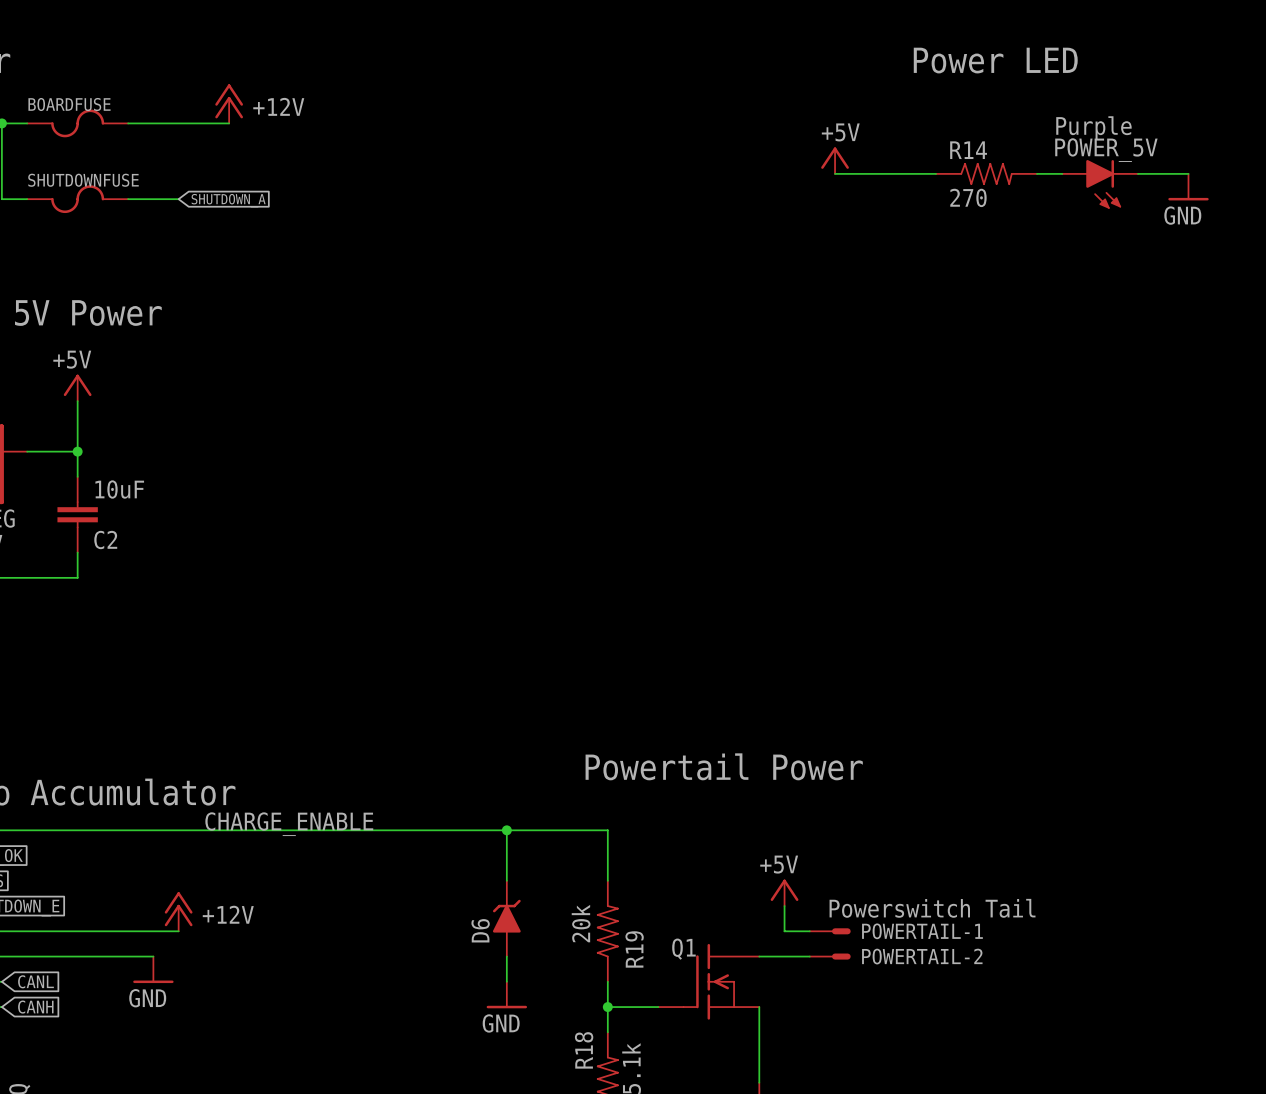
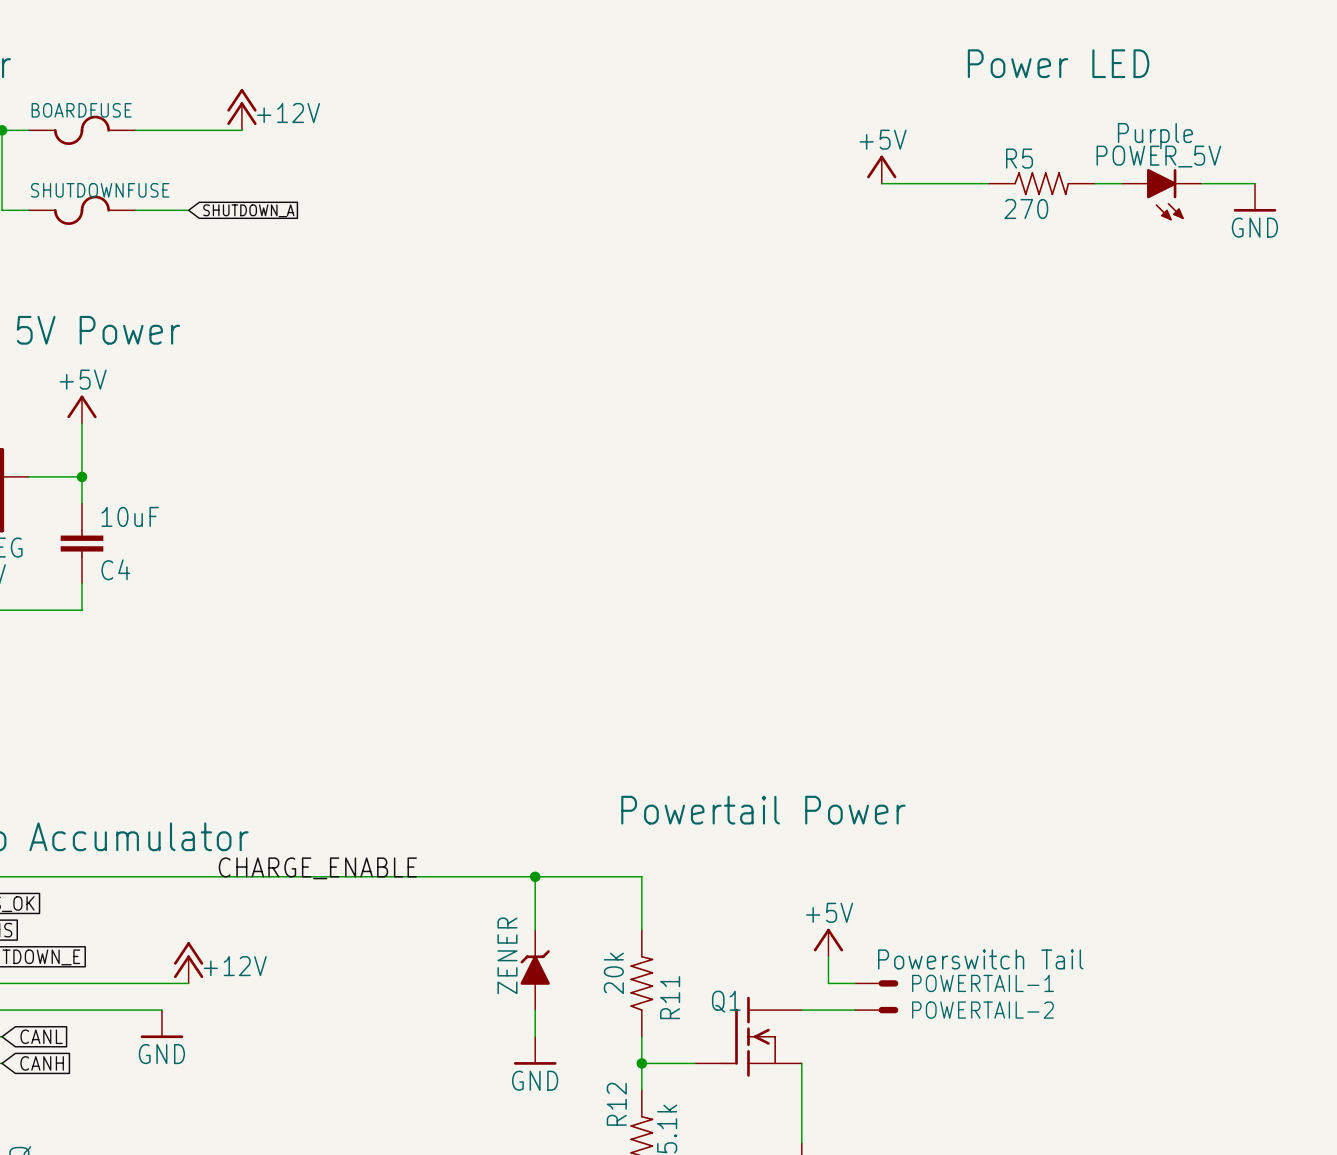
R14 name: R14 (968, 150) -> R5 (1019, 158)
C2 name: C2 (105, 540) -> C4 (115, 569)
D6 name: D6 (480, 930) -> ZENER (507, 955)
R19 name: R19 (634, 949) -> R11 (670, 997)
R18 name: R18 (584, 1050) -> R12 (616, 1104)

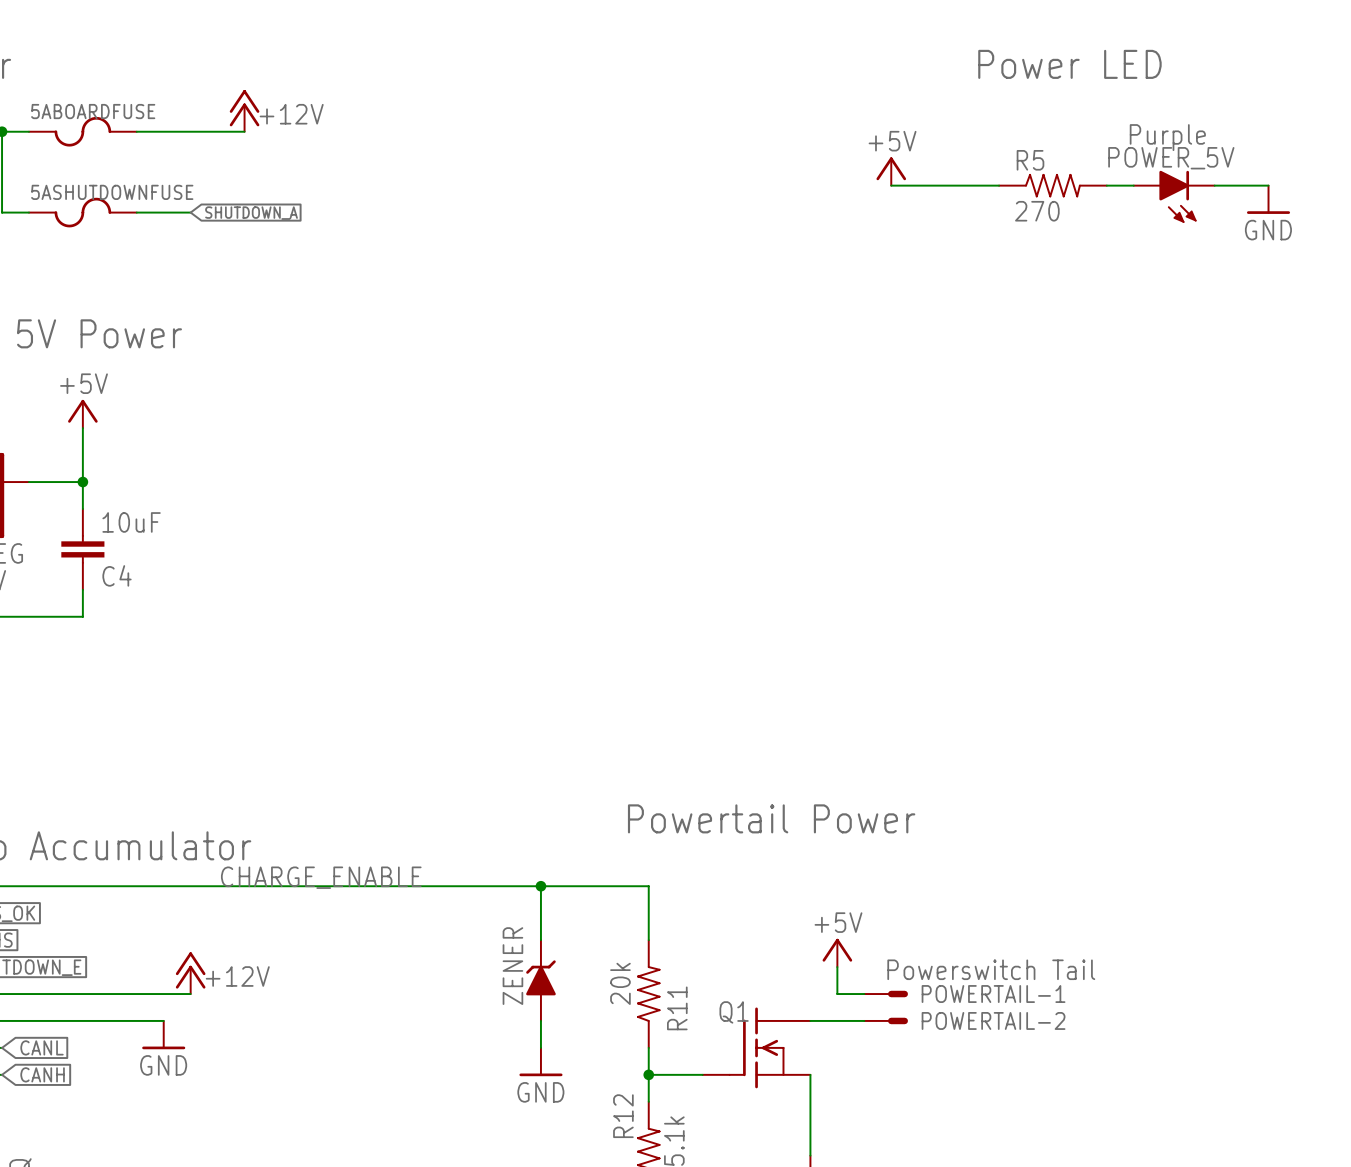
BOARDFUSE name: BOARDFUSE (81, 110) -> 5ABOARDFUSE (93, 111)
SHUTDOWNFUSE name: SHUTDOWNFUSE (100, 190) -> 5ASHUTDOWNFUSE (112, 192)

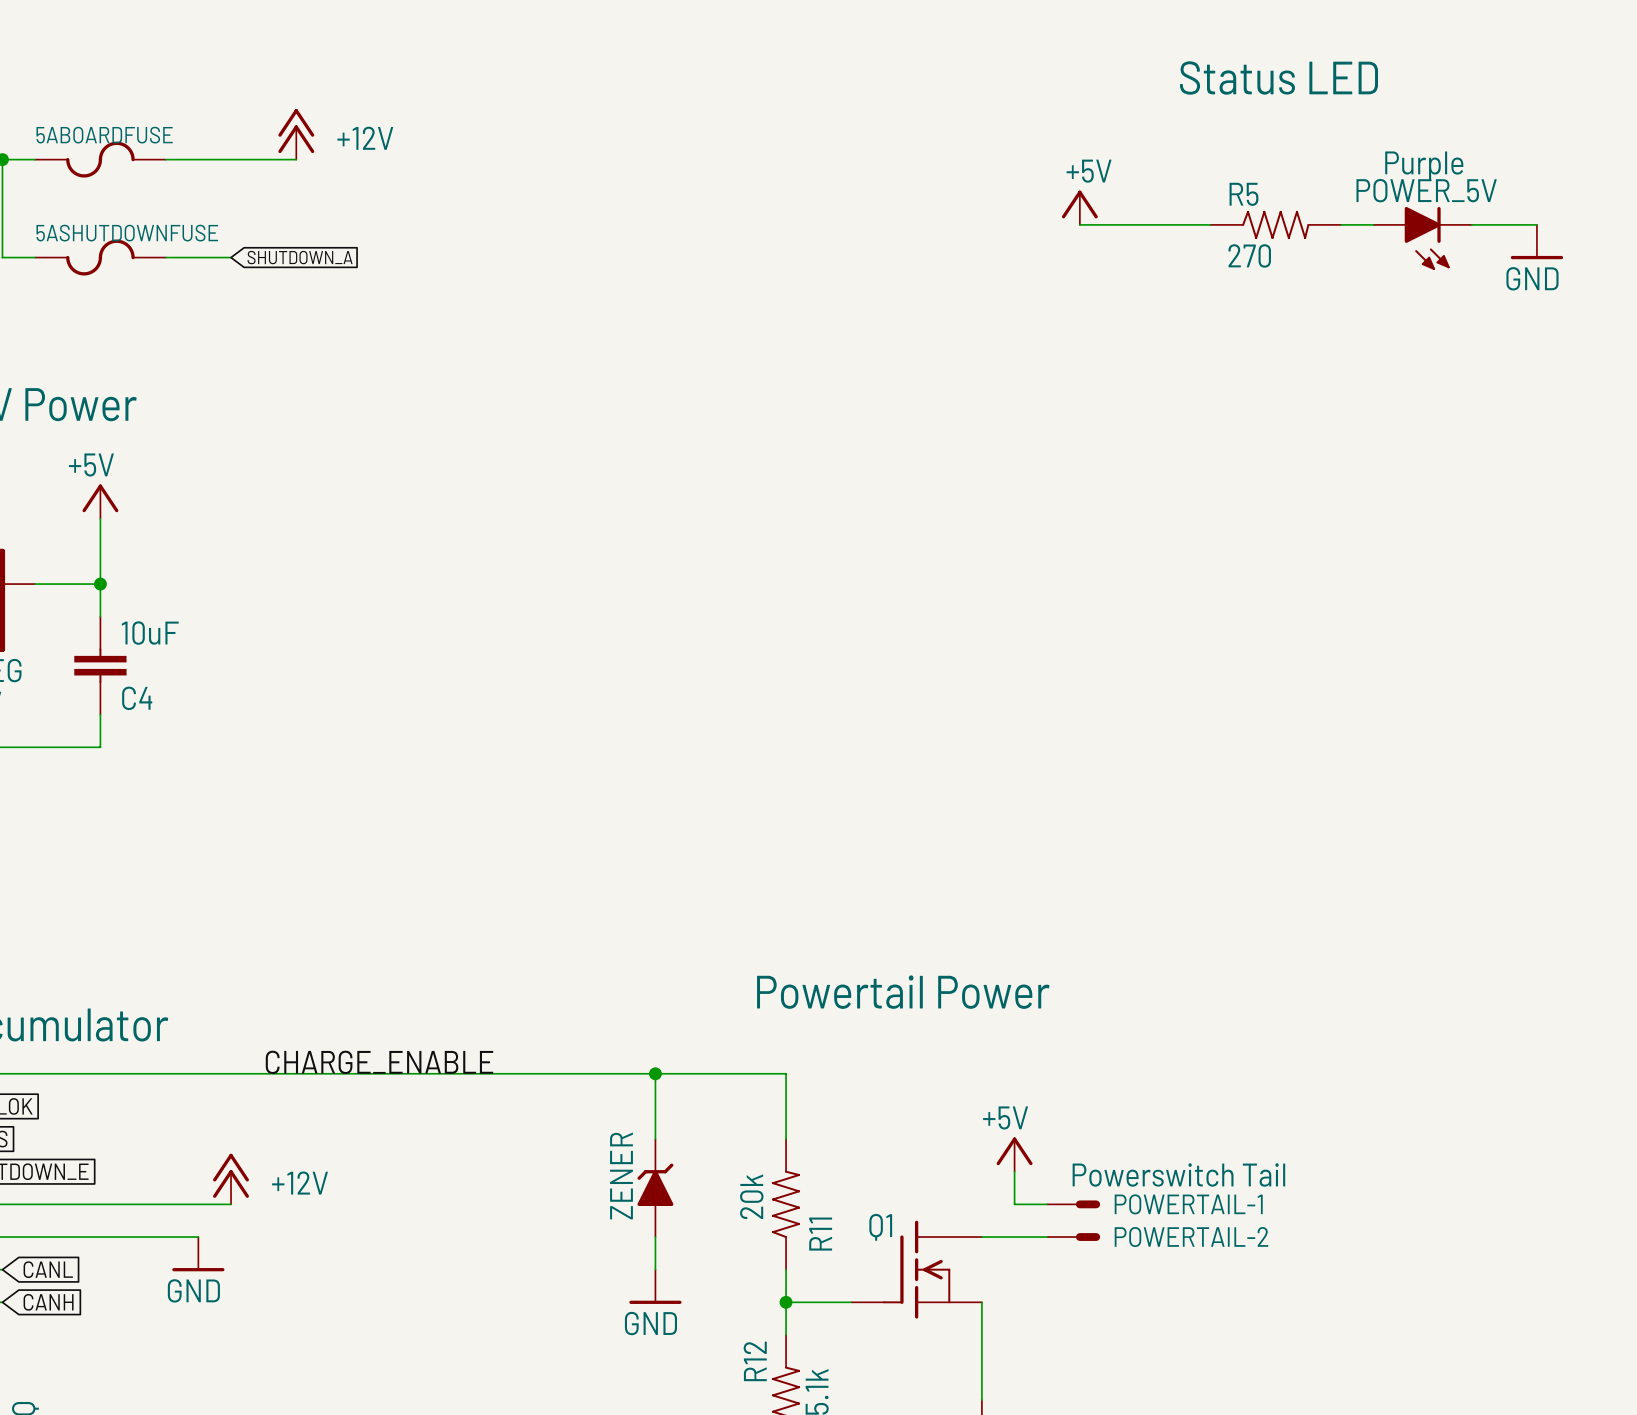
text: Power LED (1069, 64) -> Status LED (1279, 77)

